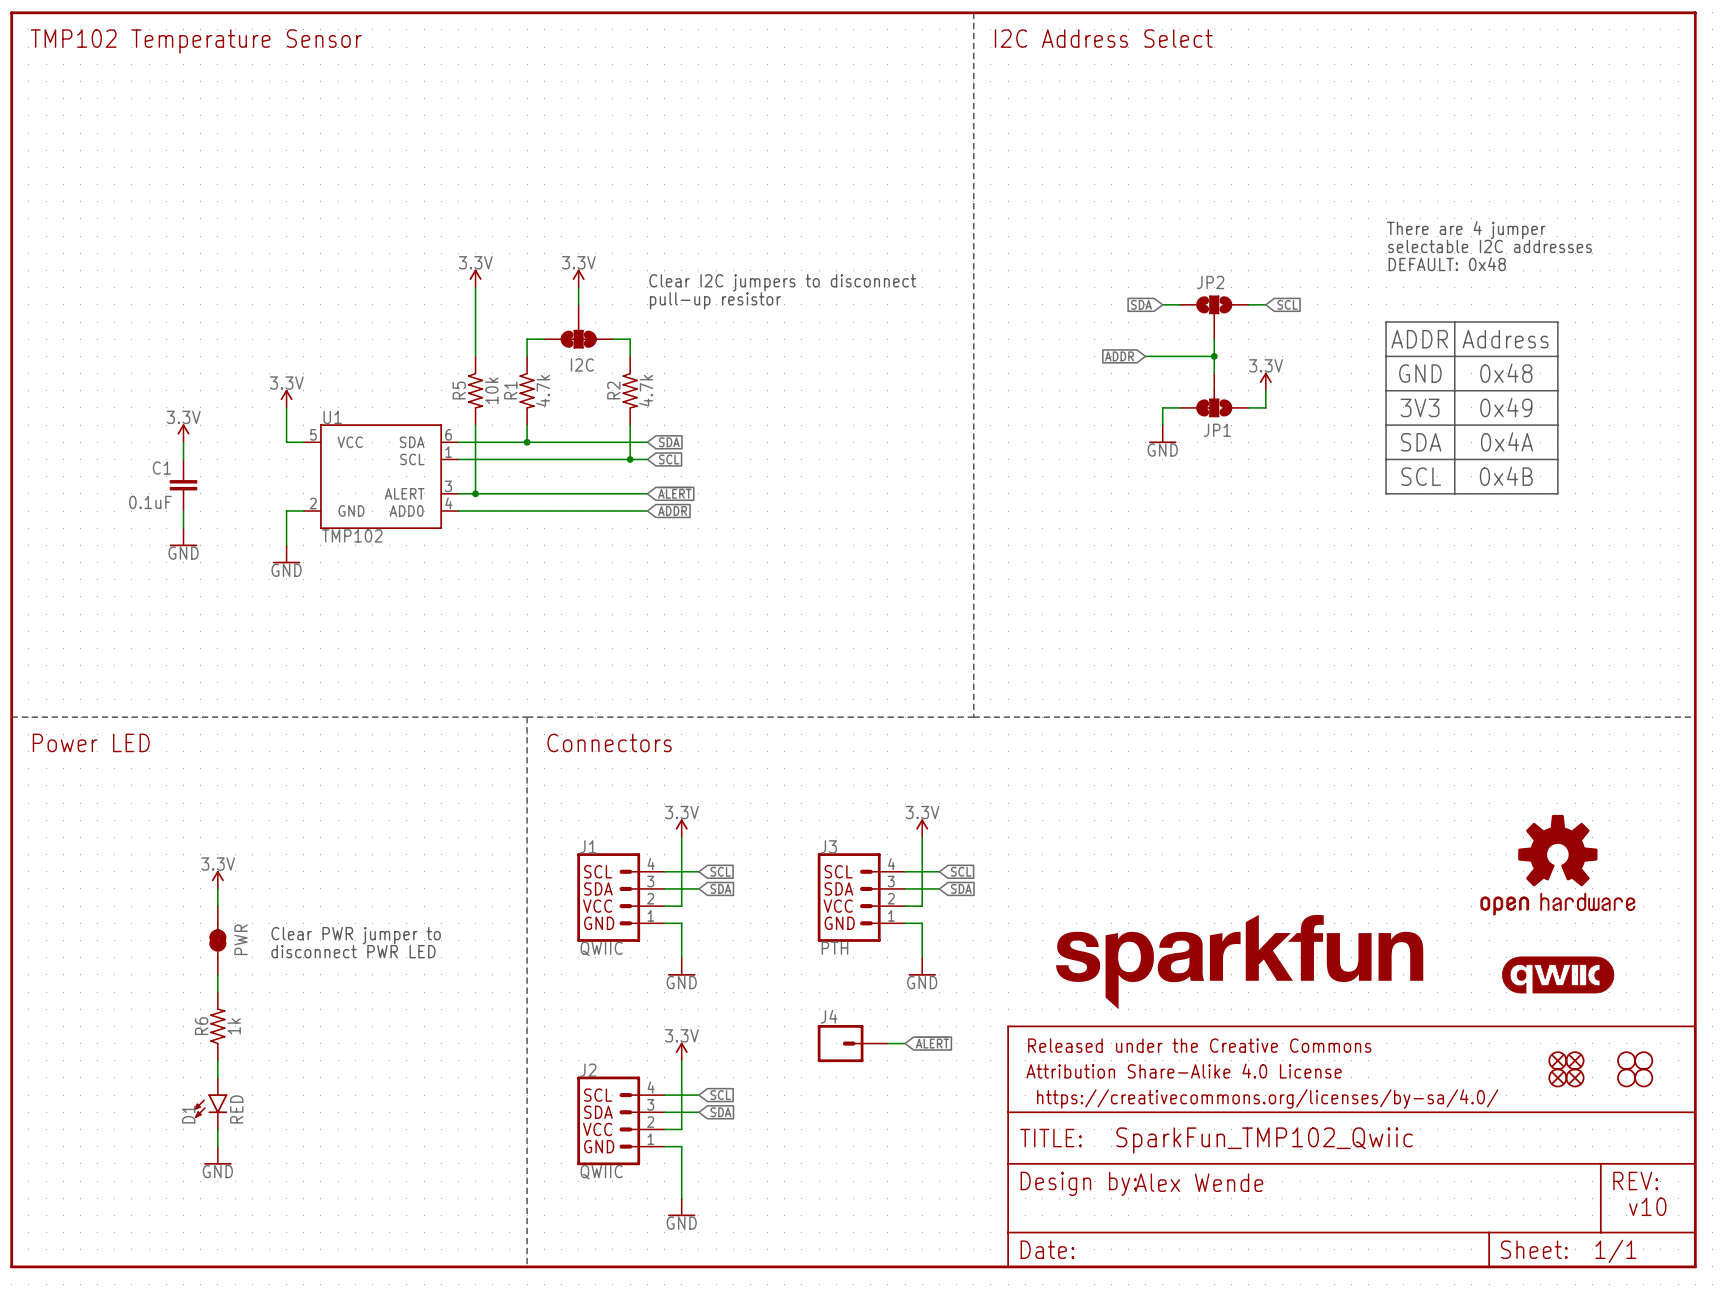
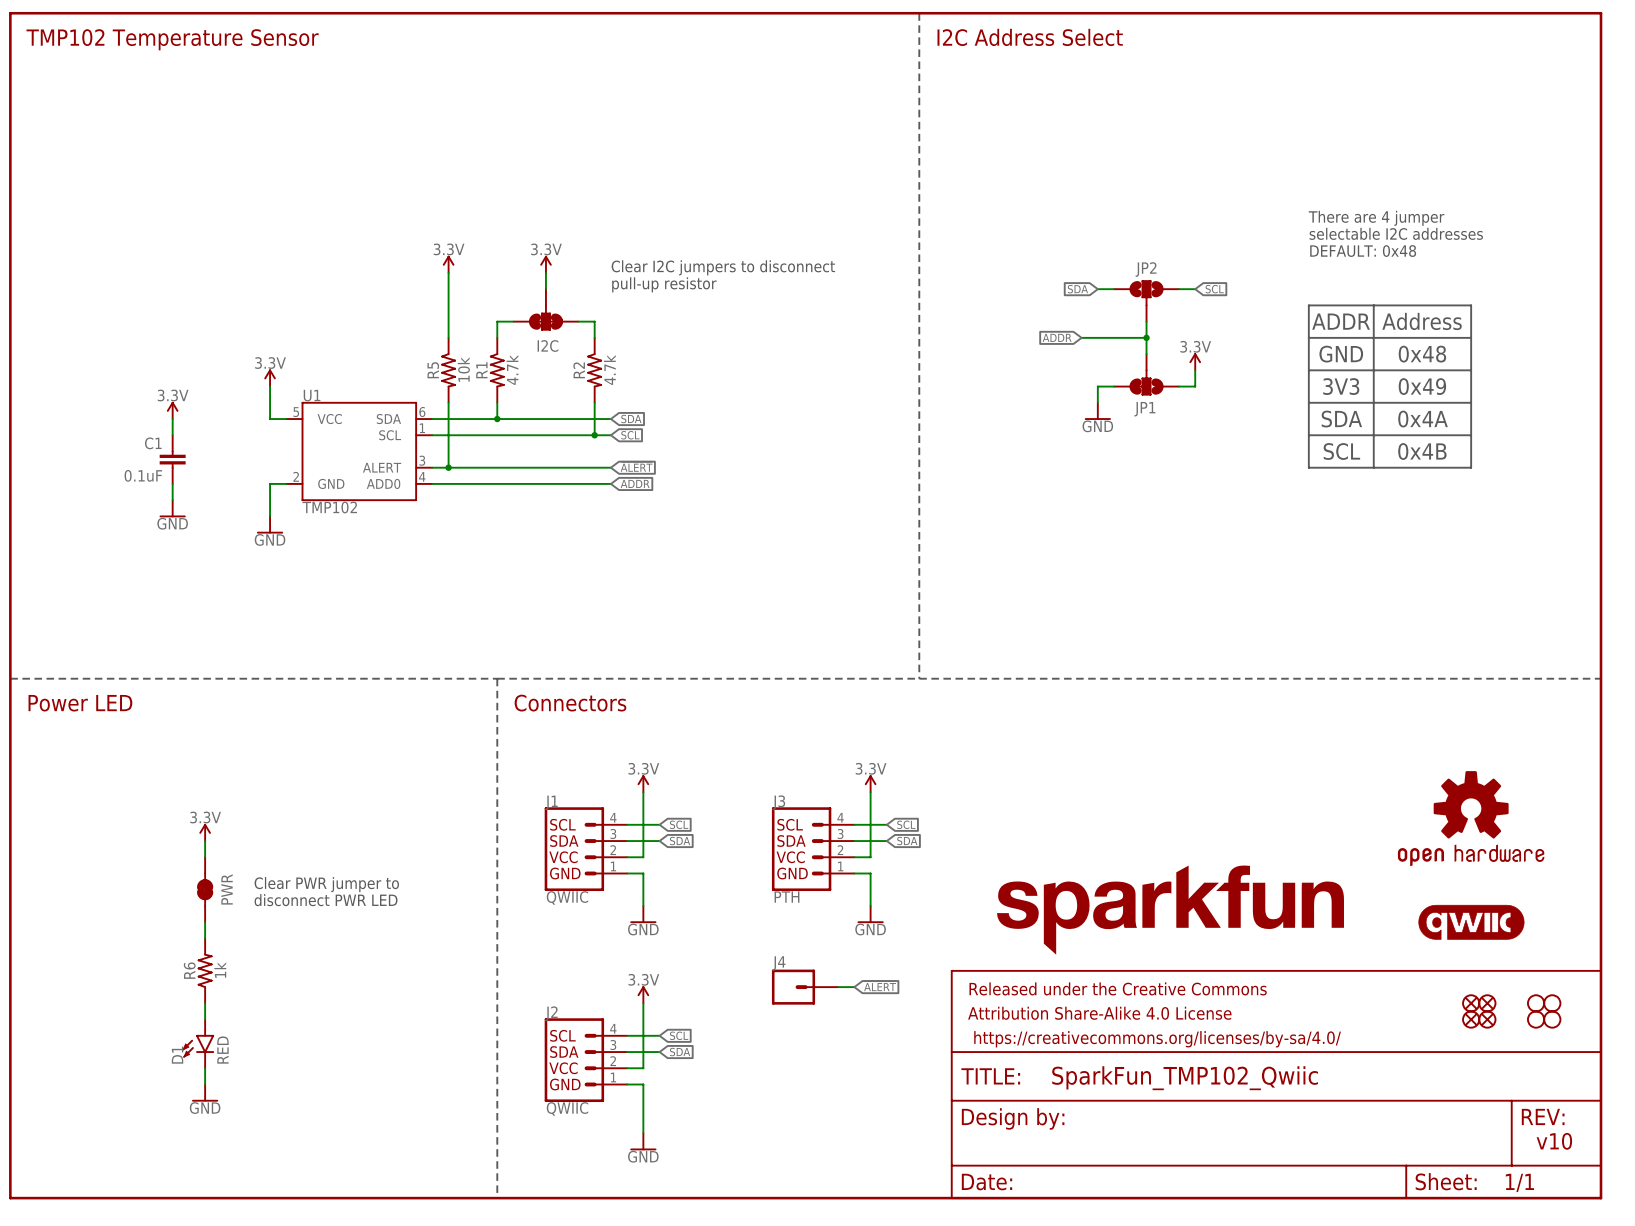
text: Alex Wende (1199, 1182) -> none

